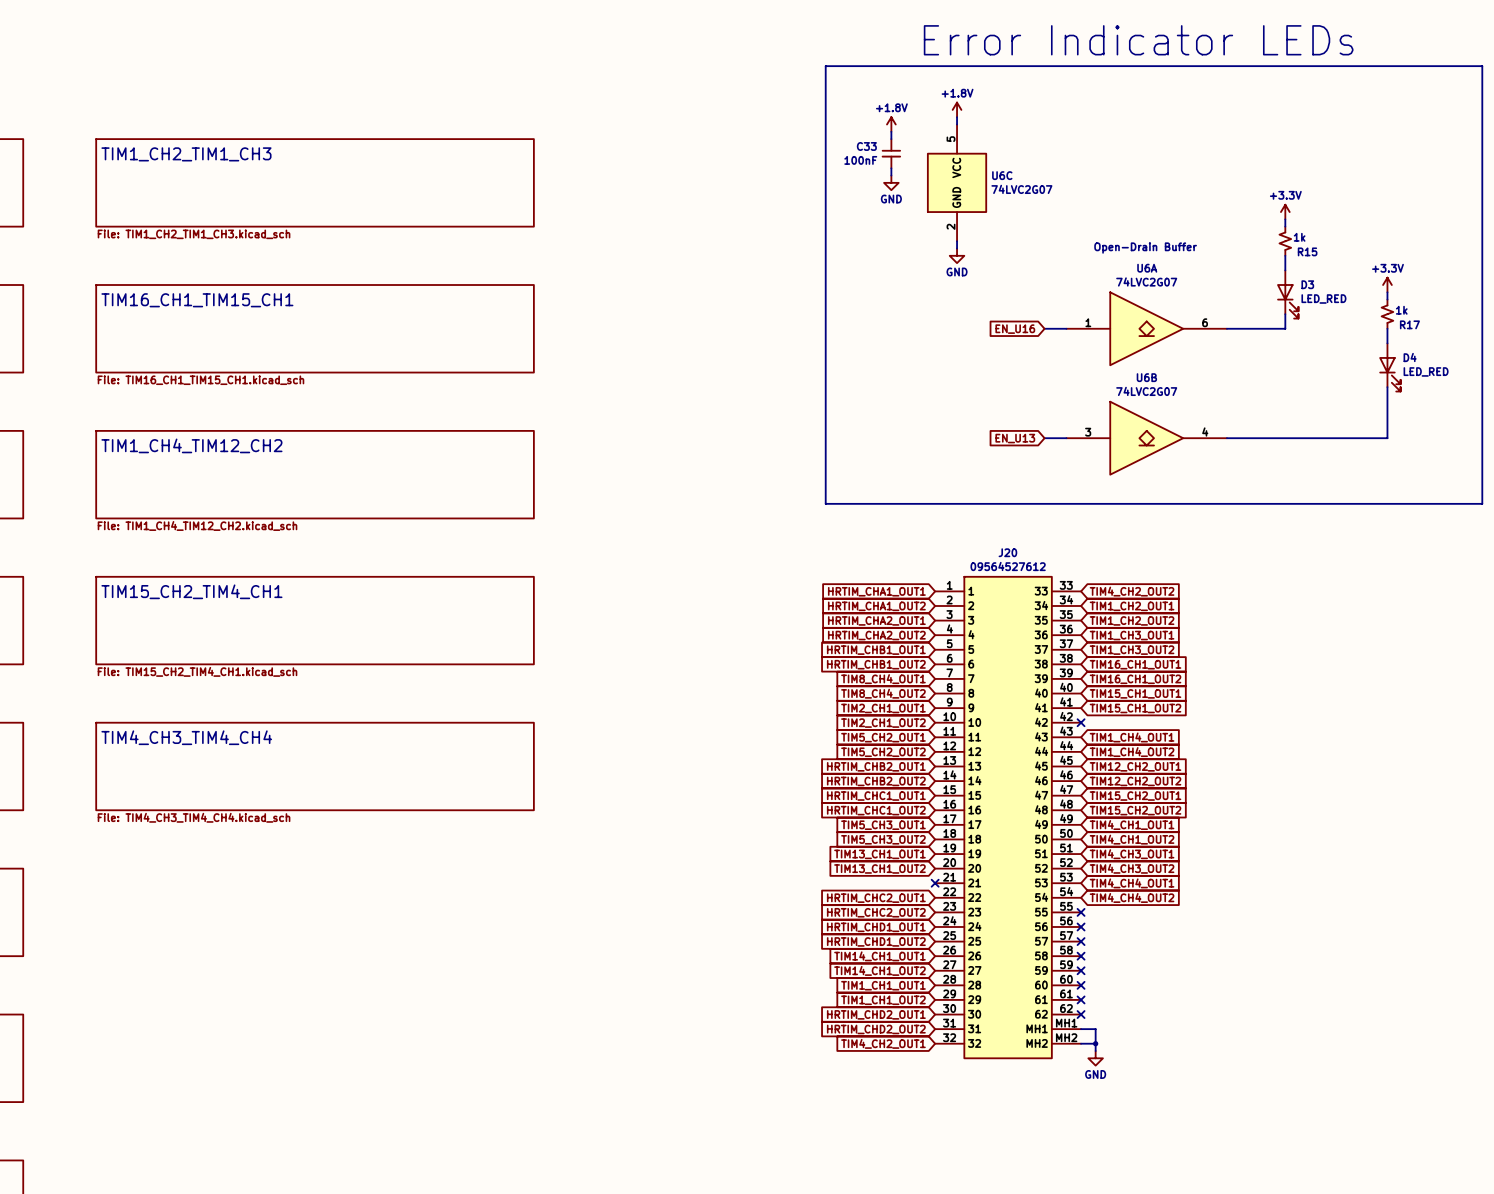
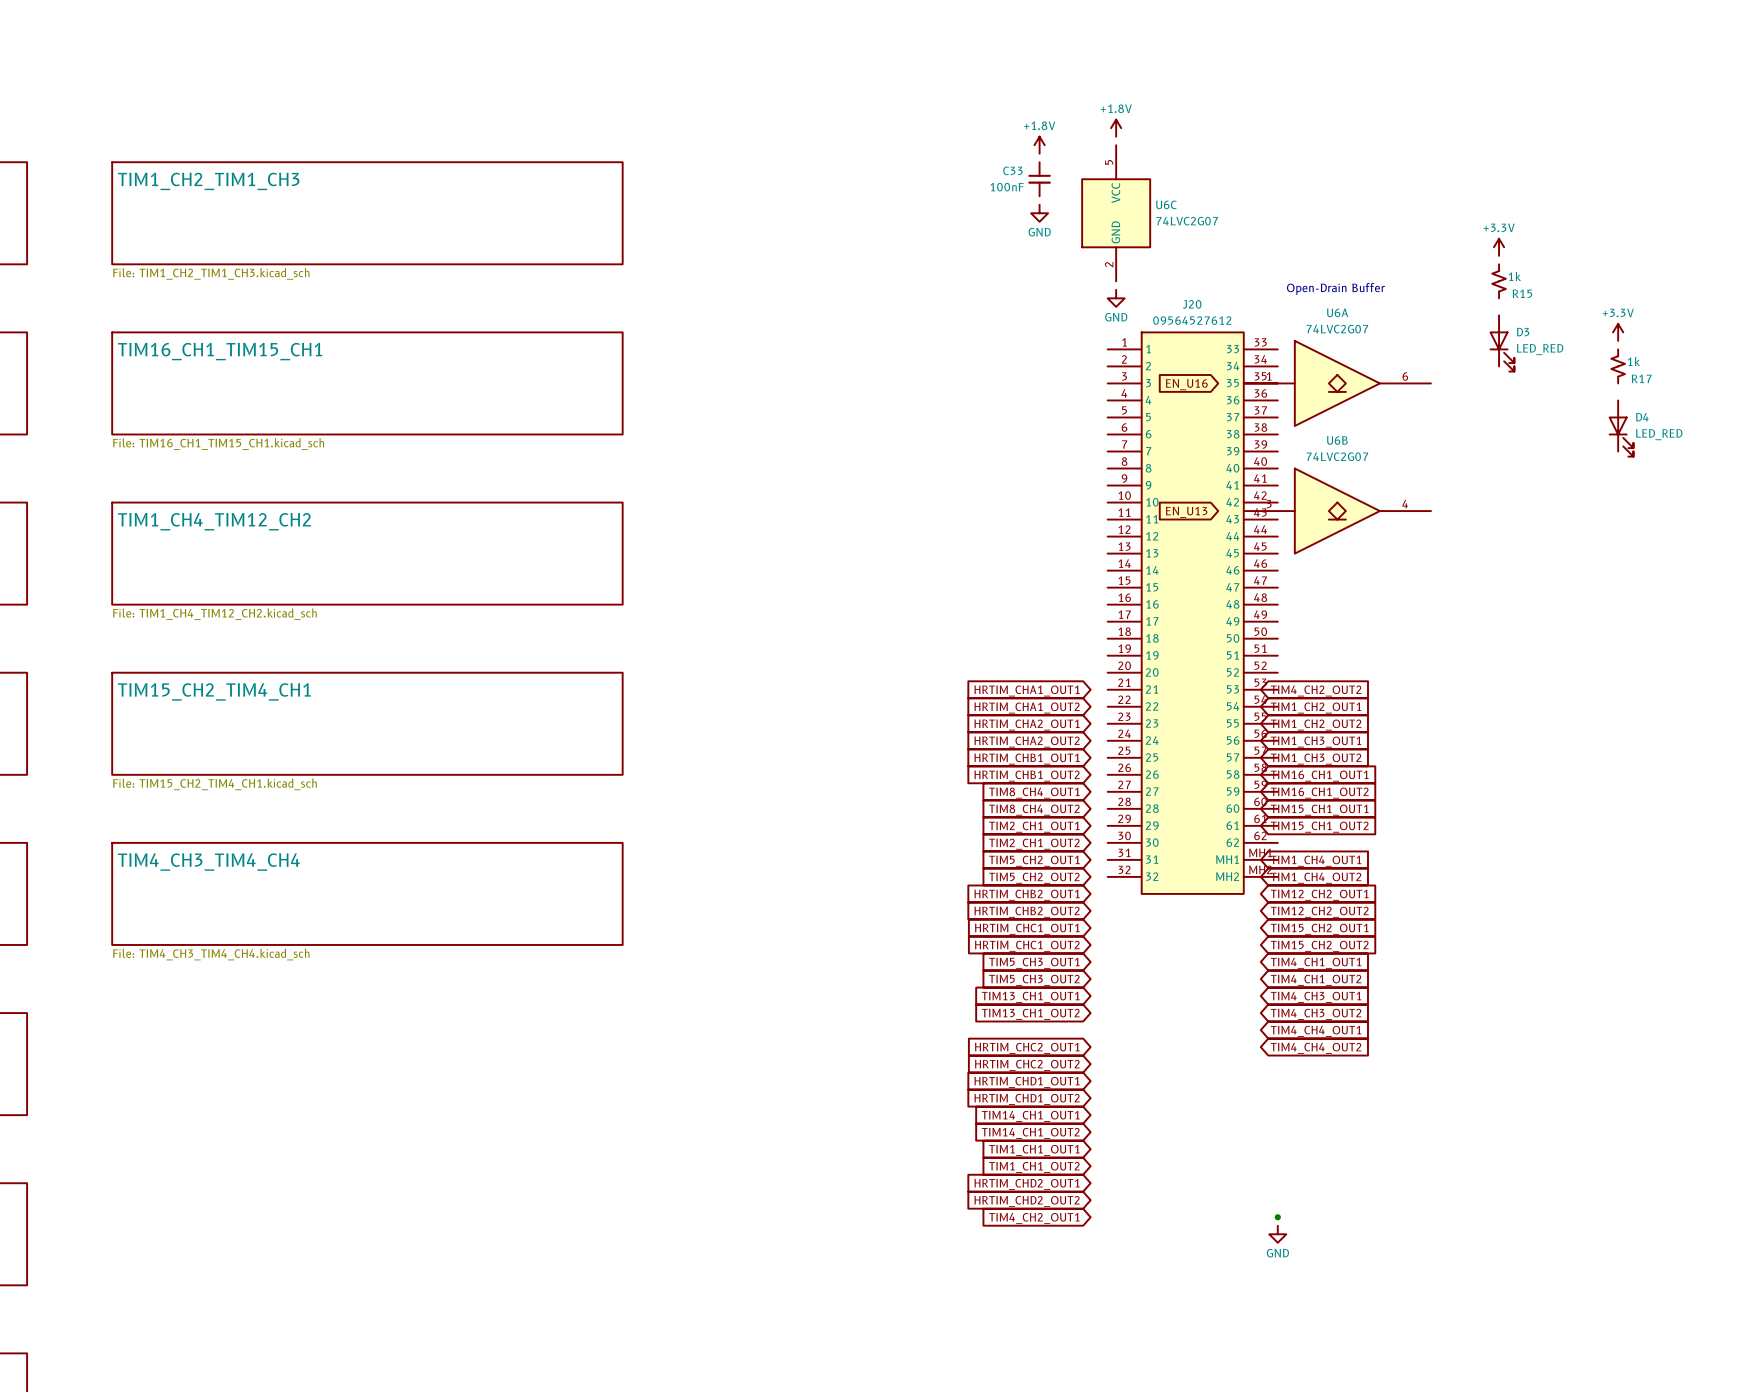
text: Error Indicator LEDs (1138, 40) -> none
line: (825, 66) (1482, 66) (1482, 503) (825, 503) (825, 66) -> none
wire: (957, 117) (957, 124) -> none
wire: (891, 131) (891, 139) -> none
wire: (891, 168) (891, 175) -> none
wire: (1285, 219) (1285, 226) -> none
wire: (957, 241) (957, 248) -> none
wire: (1285, 255) (1285, 270) -> none
wire: (1387, 292) (1387, 299) -> none
wire: (1285, 314) (1285, 328) (1226, 328) -> none
wire: (1387, 328) (1387, 343) -> none
wire: (1387, 387) (1387, 438) (1226, 438) -> none
no-connect mark: (1081, 722) -> none
J20 position: (1008, 817) -> (1192, 613)
no-connect mark: (935, 883) -> none
no-connect mark: (1081, 912) -> none
no-connect mark: (1081, 926) -> none
no-connect mark: (1081, 941) -> none
no-connect mark: (1081, 956) -> none
no-connect mark: (1081, 970) -> none
no-connect mark: (1081, 985) -> none
no-connect mark: (1081, 999) -> none
no-connect mark: (1081, 1014) -> none
wire: (1081, 1029) (1095, 1029) (1095, 1051) -> none
wire: (1081, 1043) (1095, 1043) -> none

